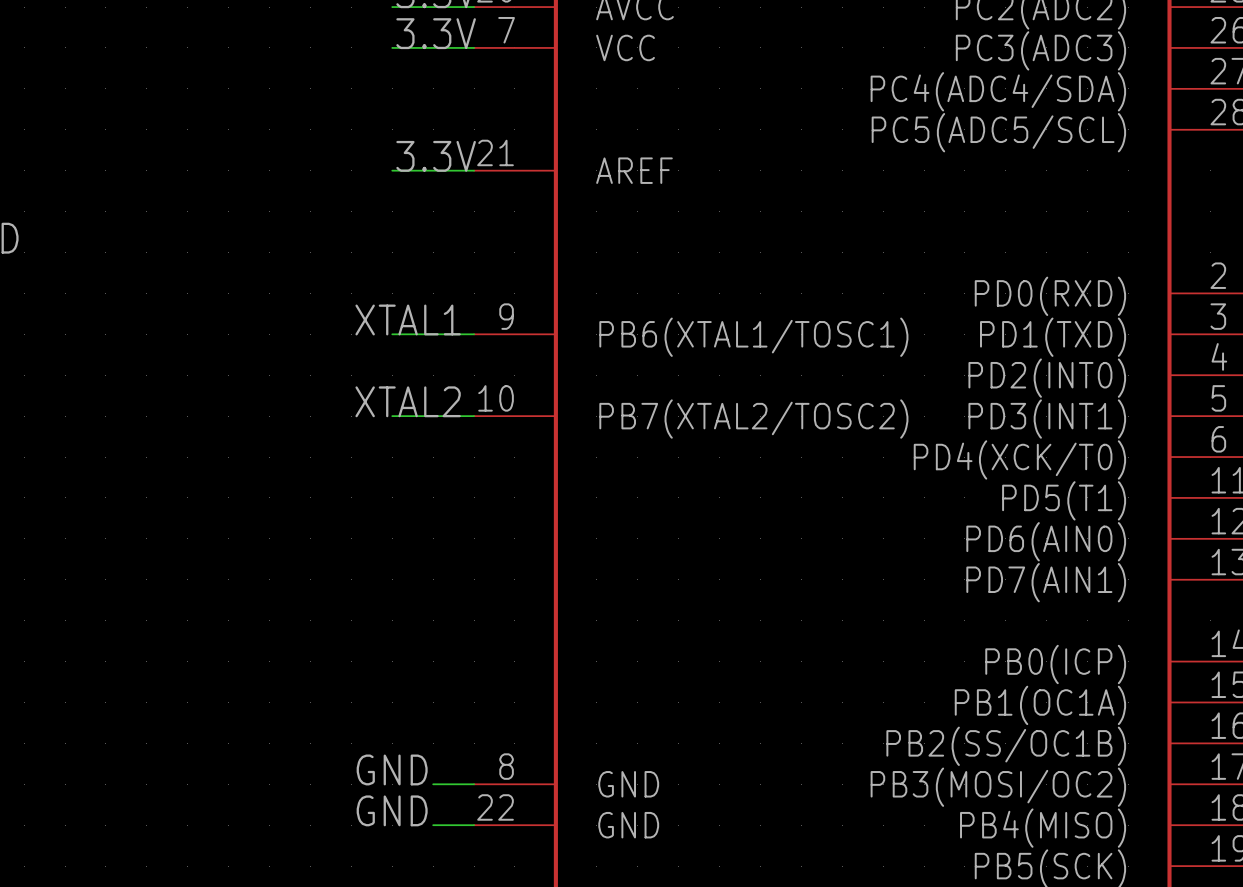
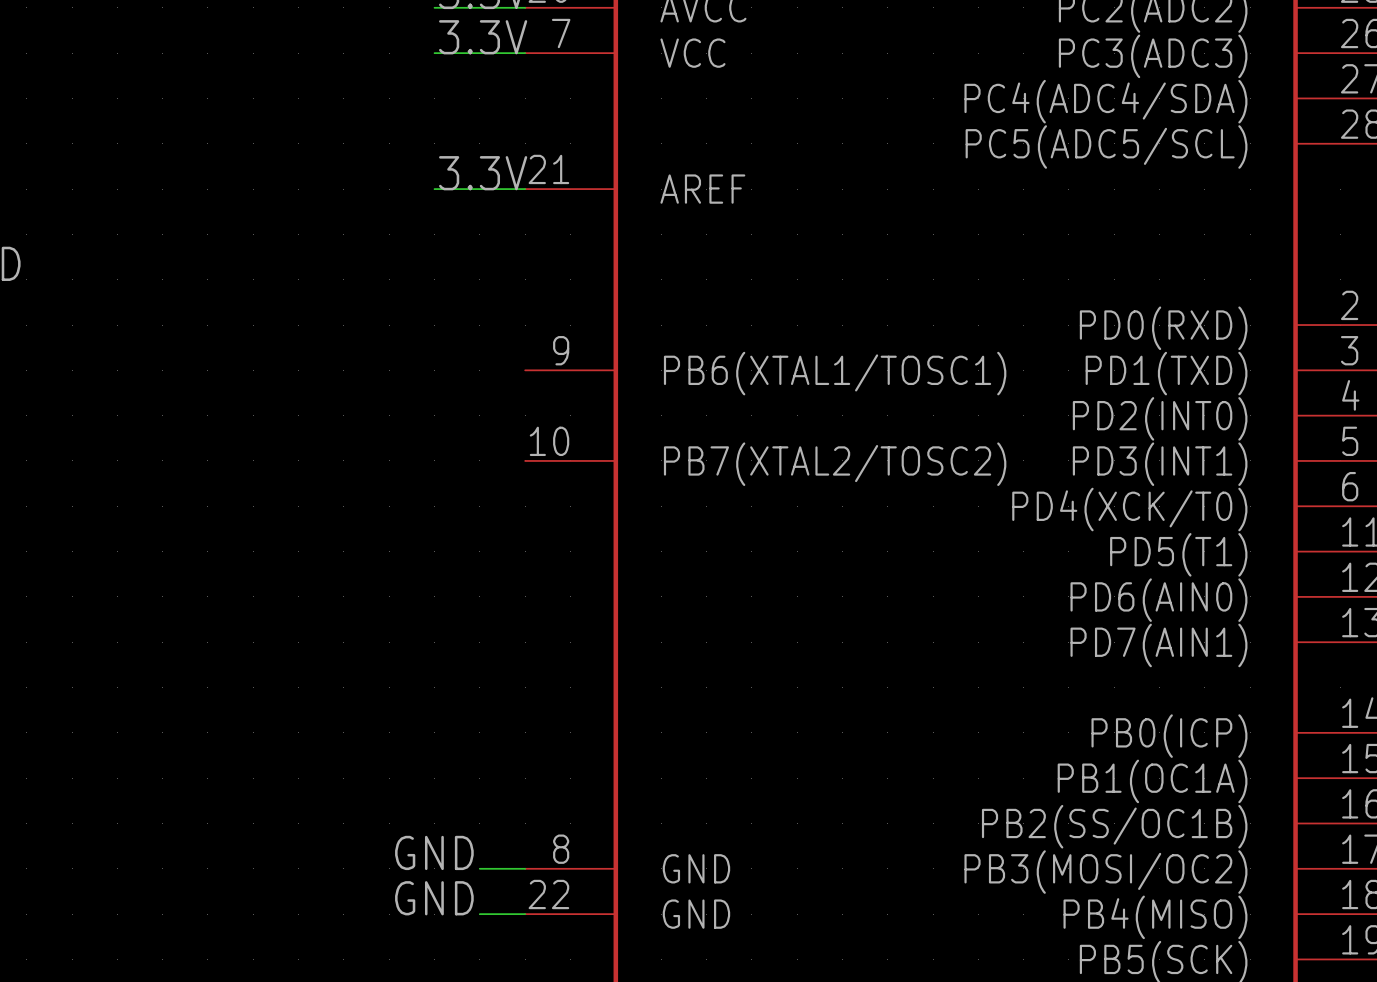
label: XTAL1 (408, 319) -> none
wire: (392, 334) (474, 334) -> none
label: XTAL2 (408, 401) -> none
wire: (392, 416) (474, 416) -> none

